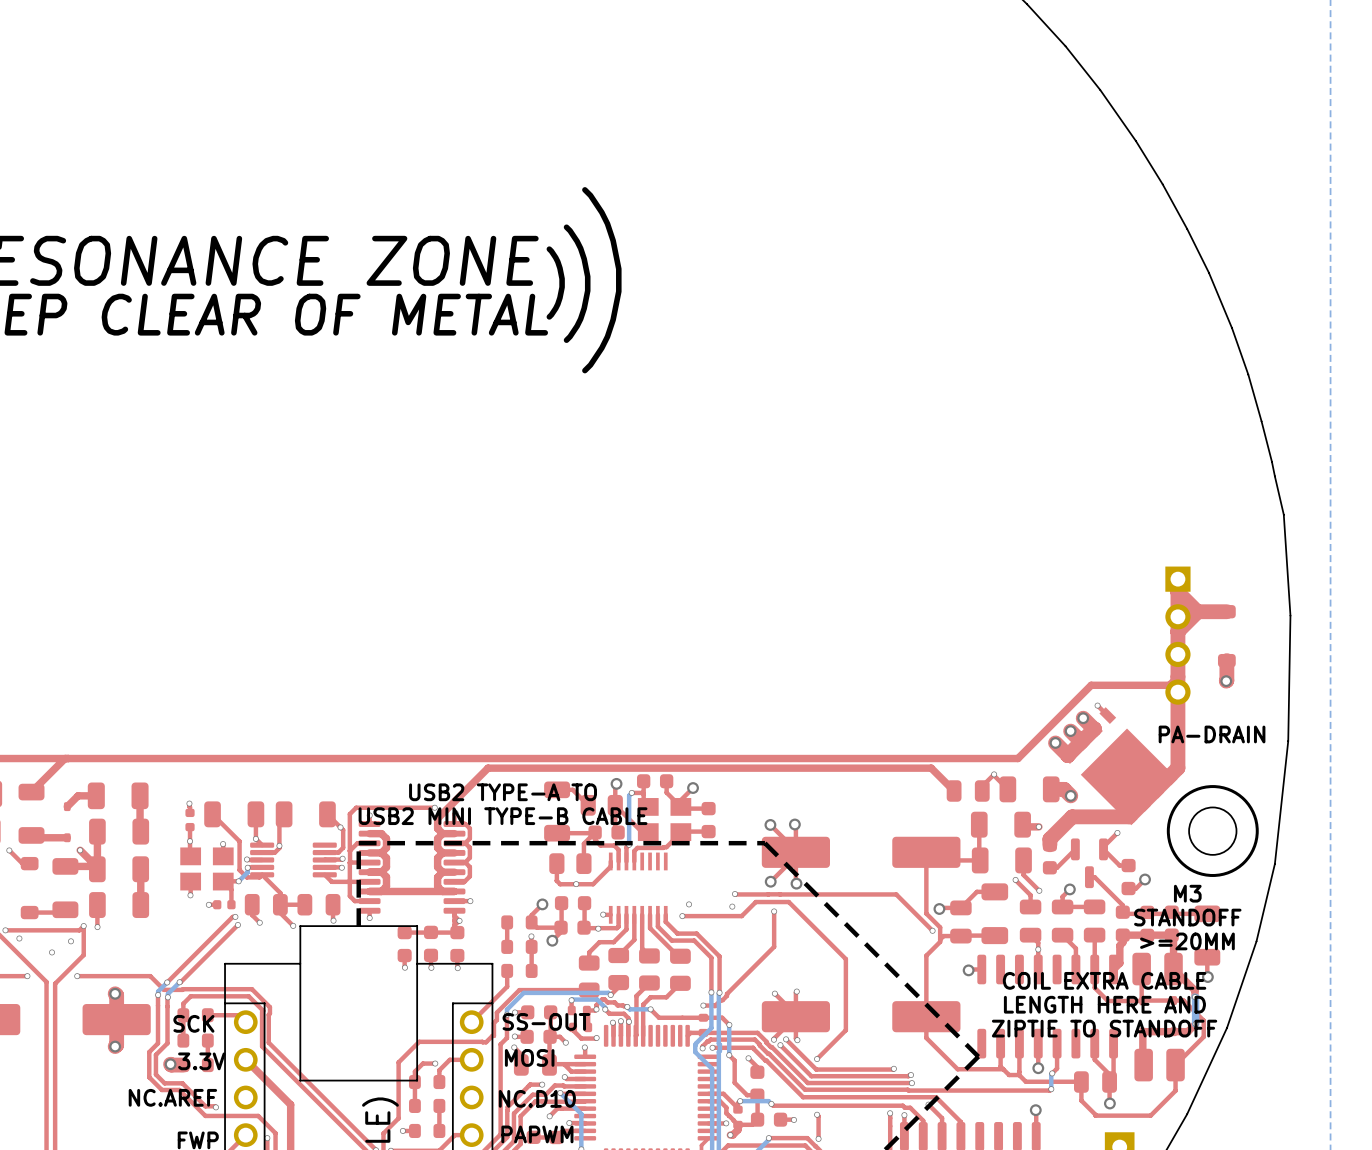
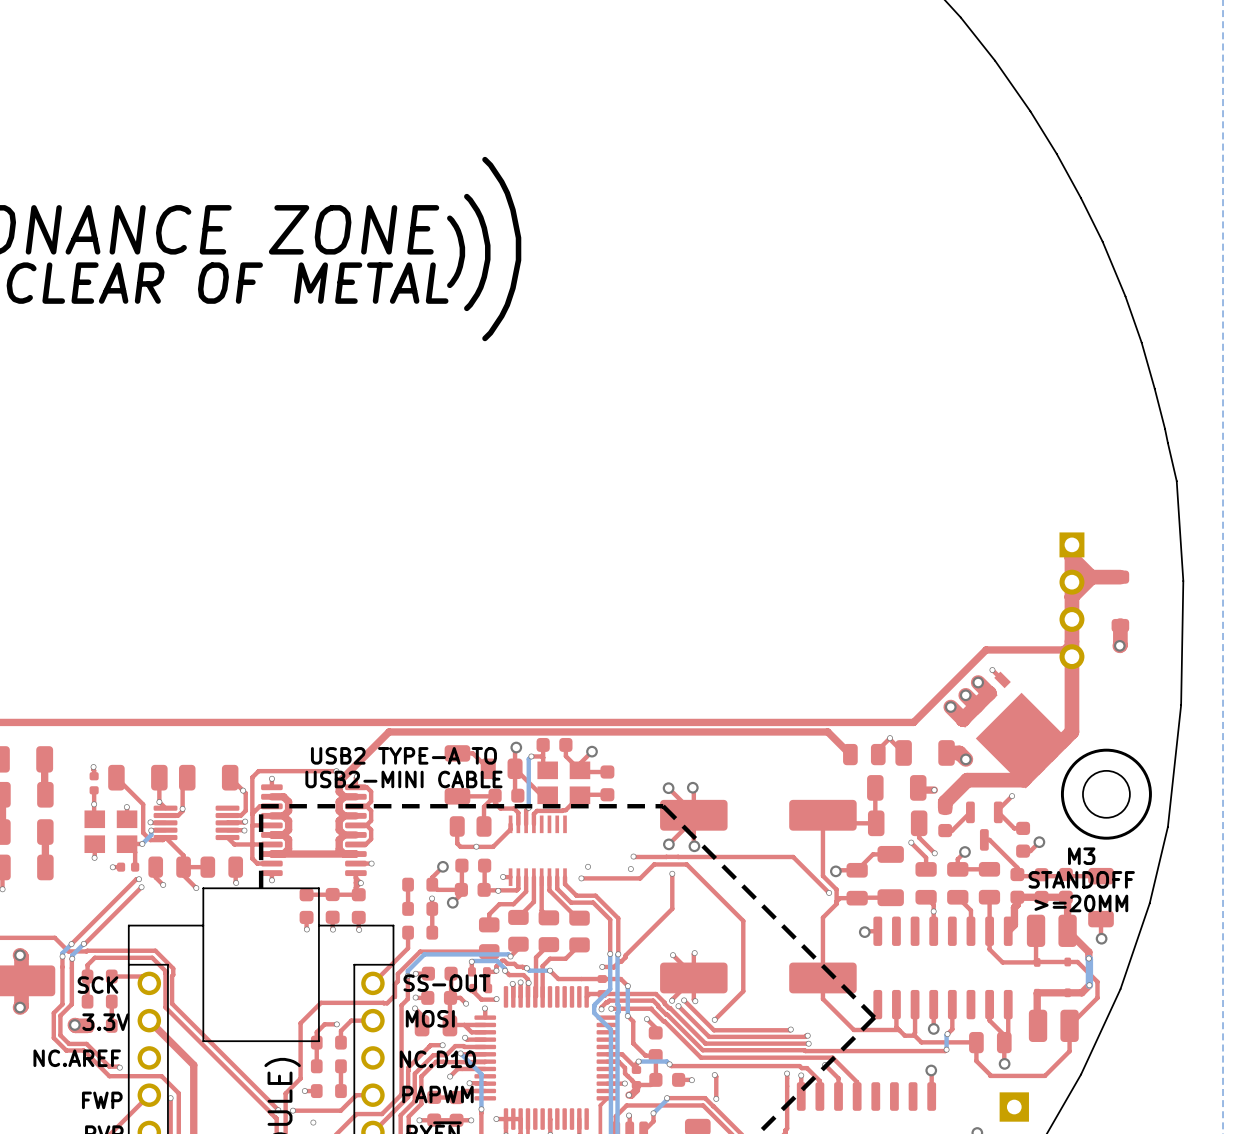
text: PA-DRAIN (1212, 734) -> none
text: USB2 MINI TYPE-B CABLE (503, 816) -> USB2-MINI CABLE (403, 779)
text: COIL EXTRA CABLE (1104, 980) -> none
text: LENGTH HERE AND (1104, 1004) -> none
text: ZIPTIE TO STANDOFF (1104, 1028) -> none

